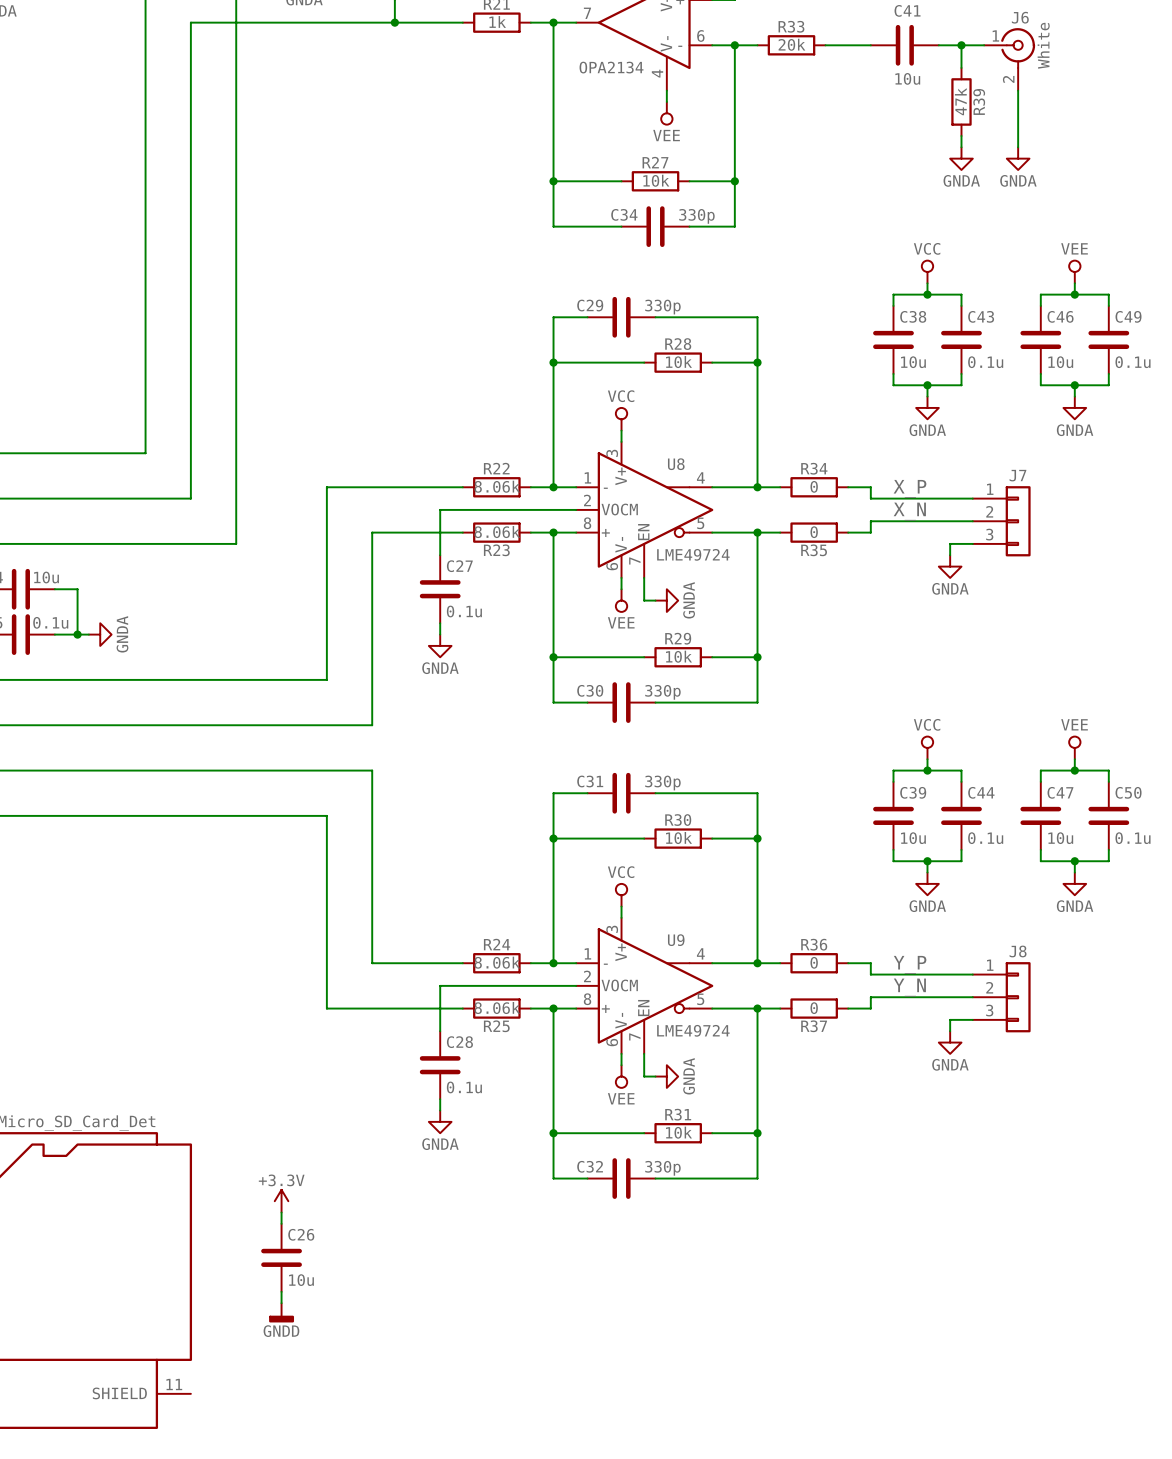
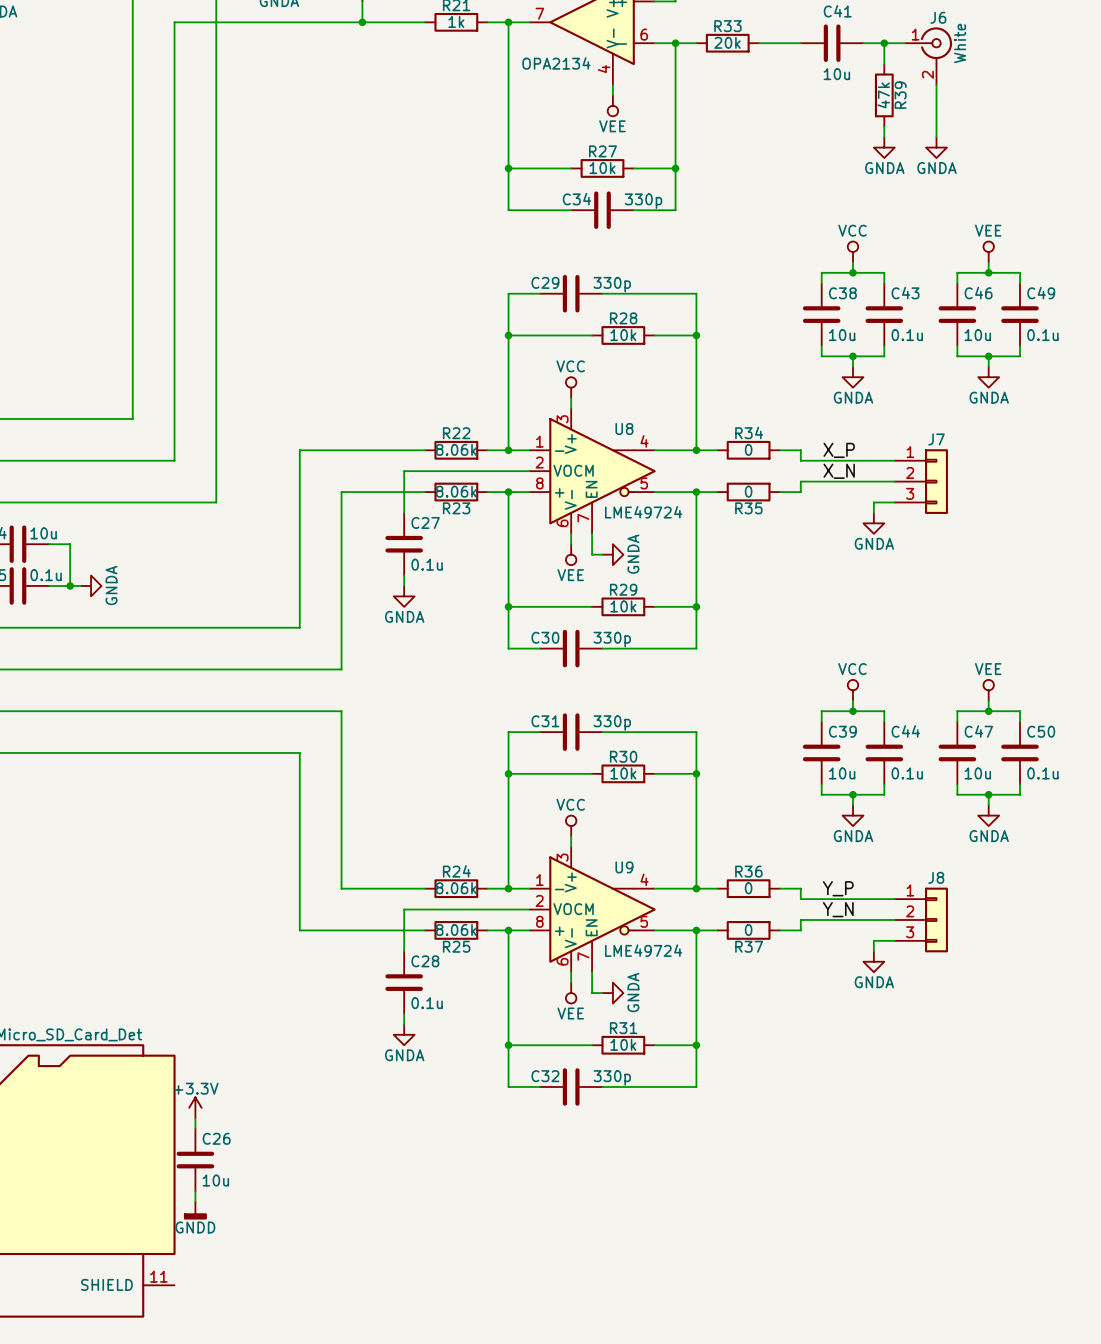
power symbol position: +3.3V (281, 1201) -> +3.3V (195, 1107)
wire: (281, 1212) (281, 1223) -> (195, 1118) (195, 1128)
C26 position: (281, 1257) -> (195, 1160)
wire: (281, 1291) (281, 1303) -> (195, 1191) (195, 1201)
power symbol position: GNDD (281, 1312) -> GNDD (195, 1210)

